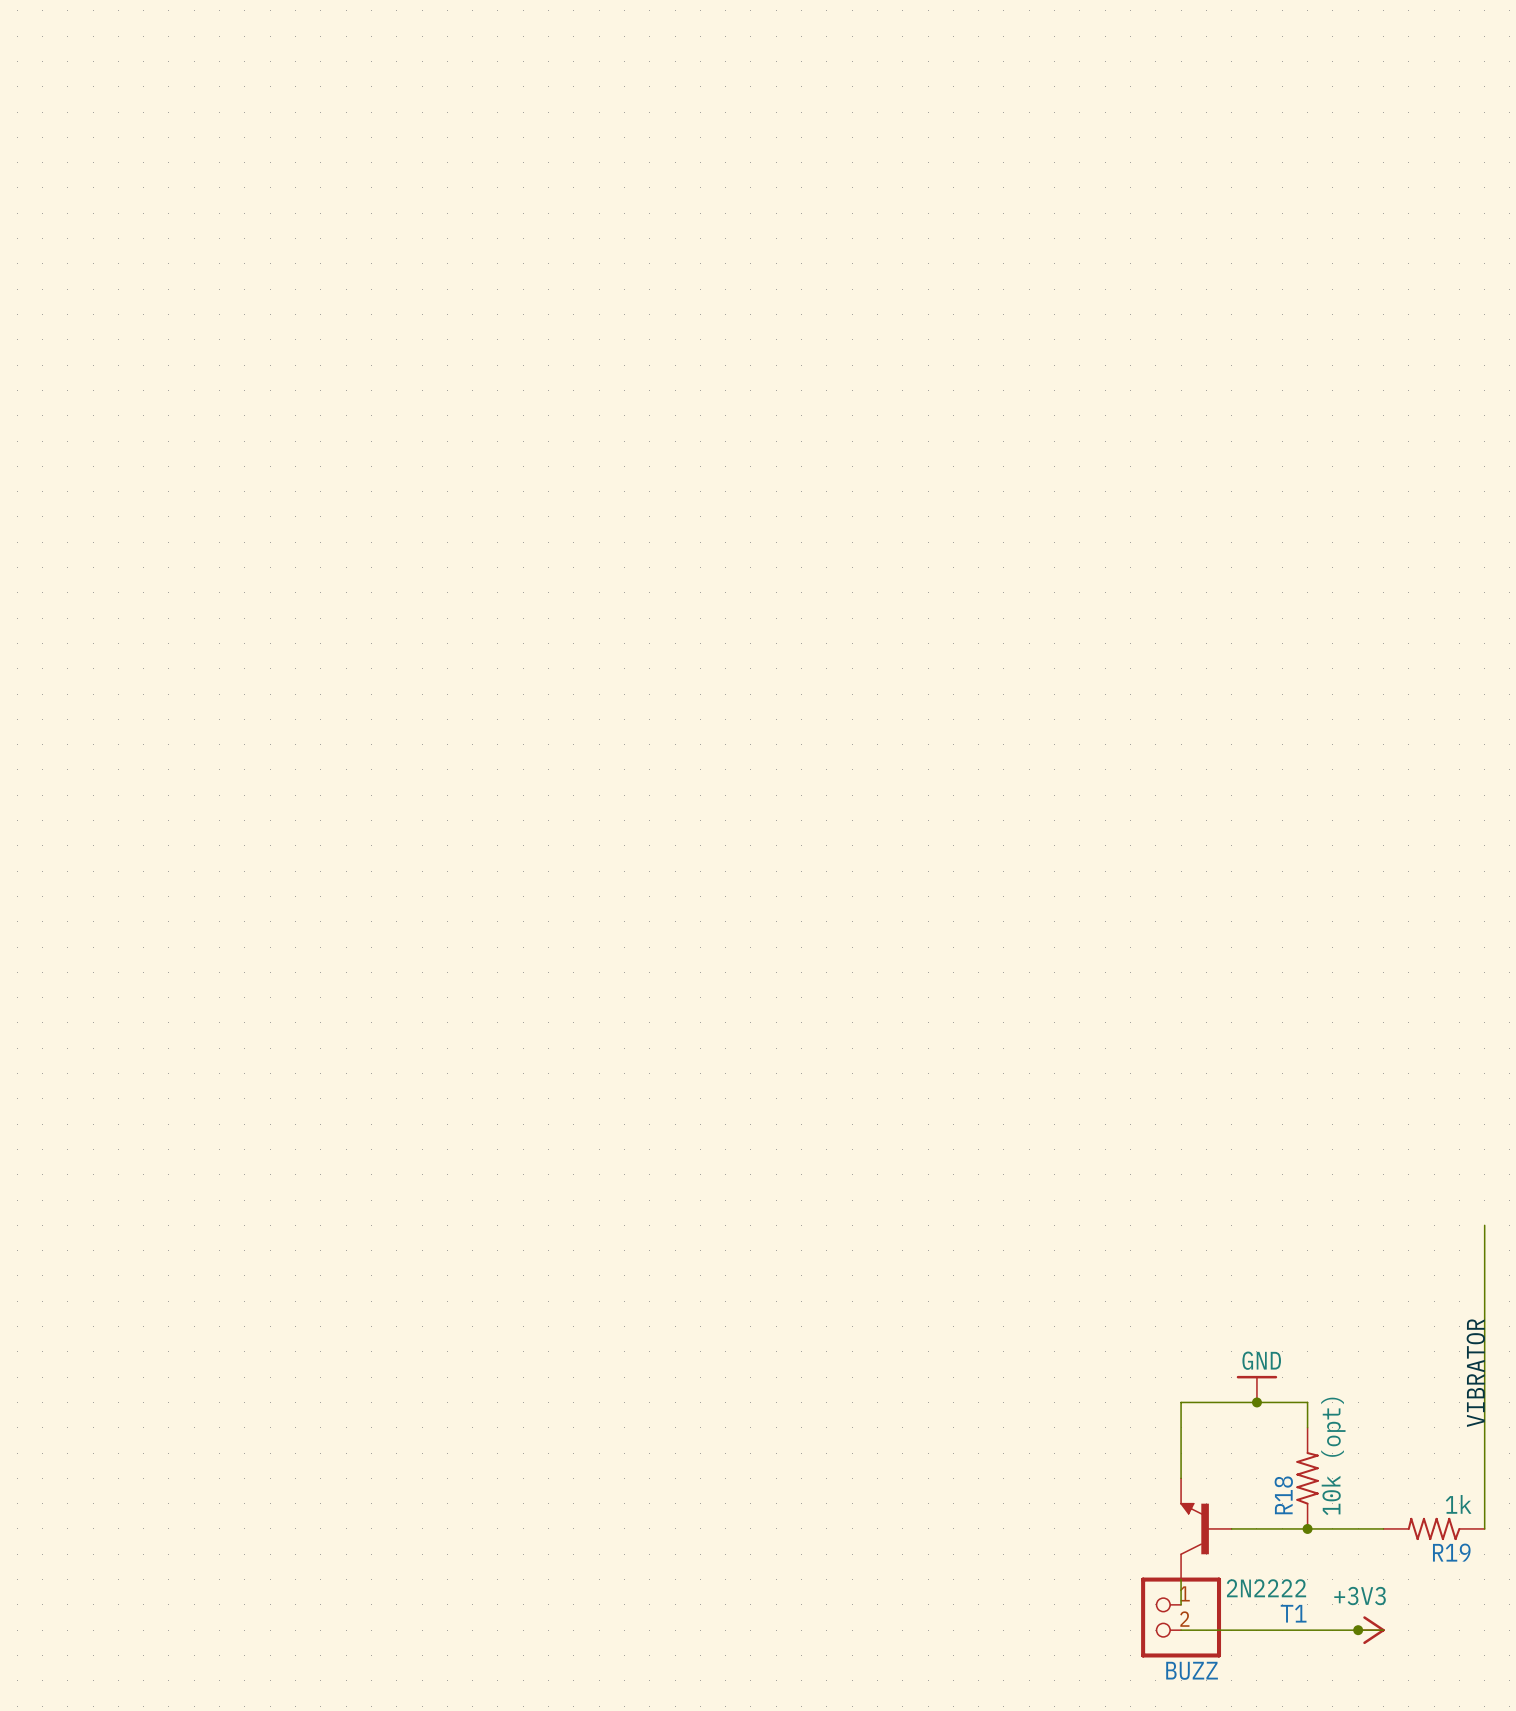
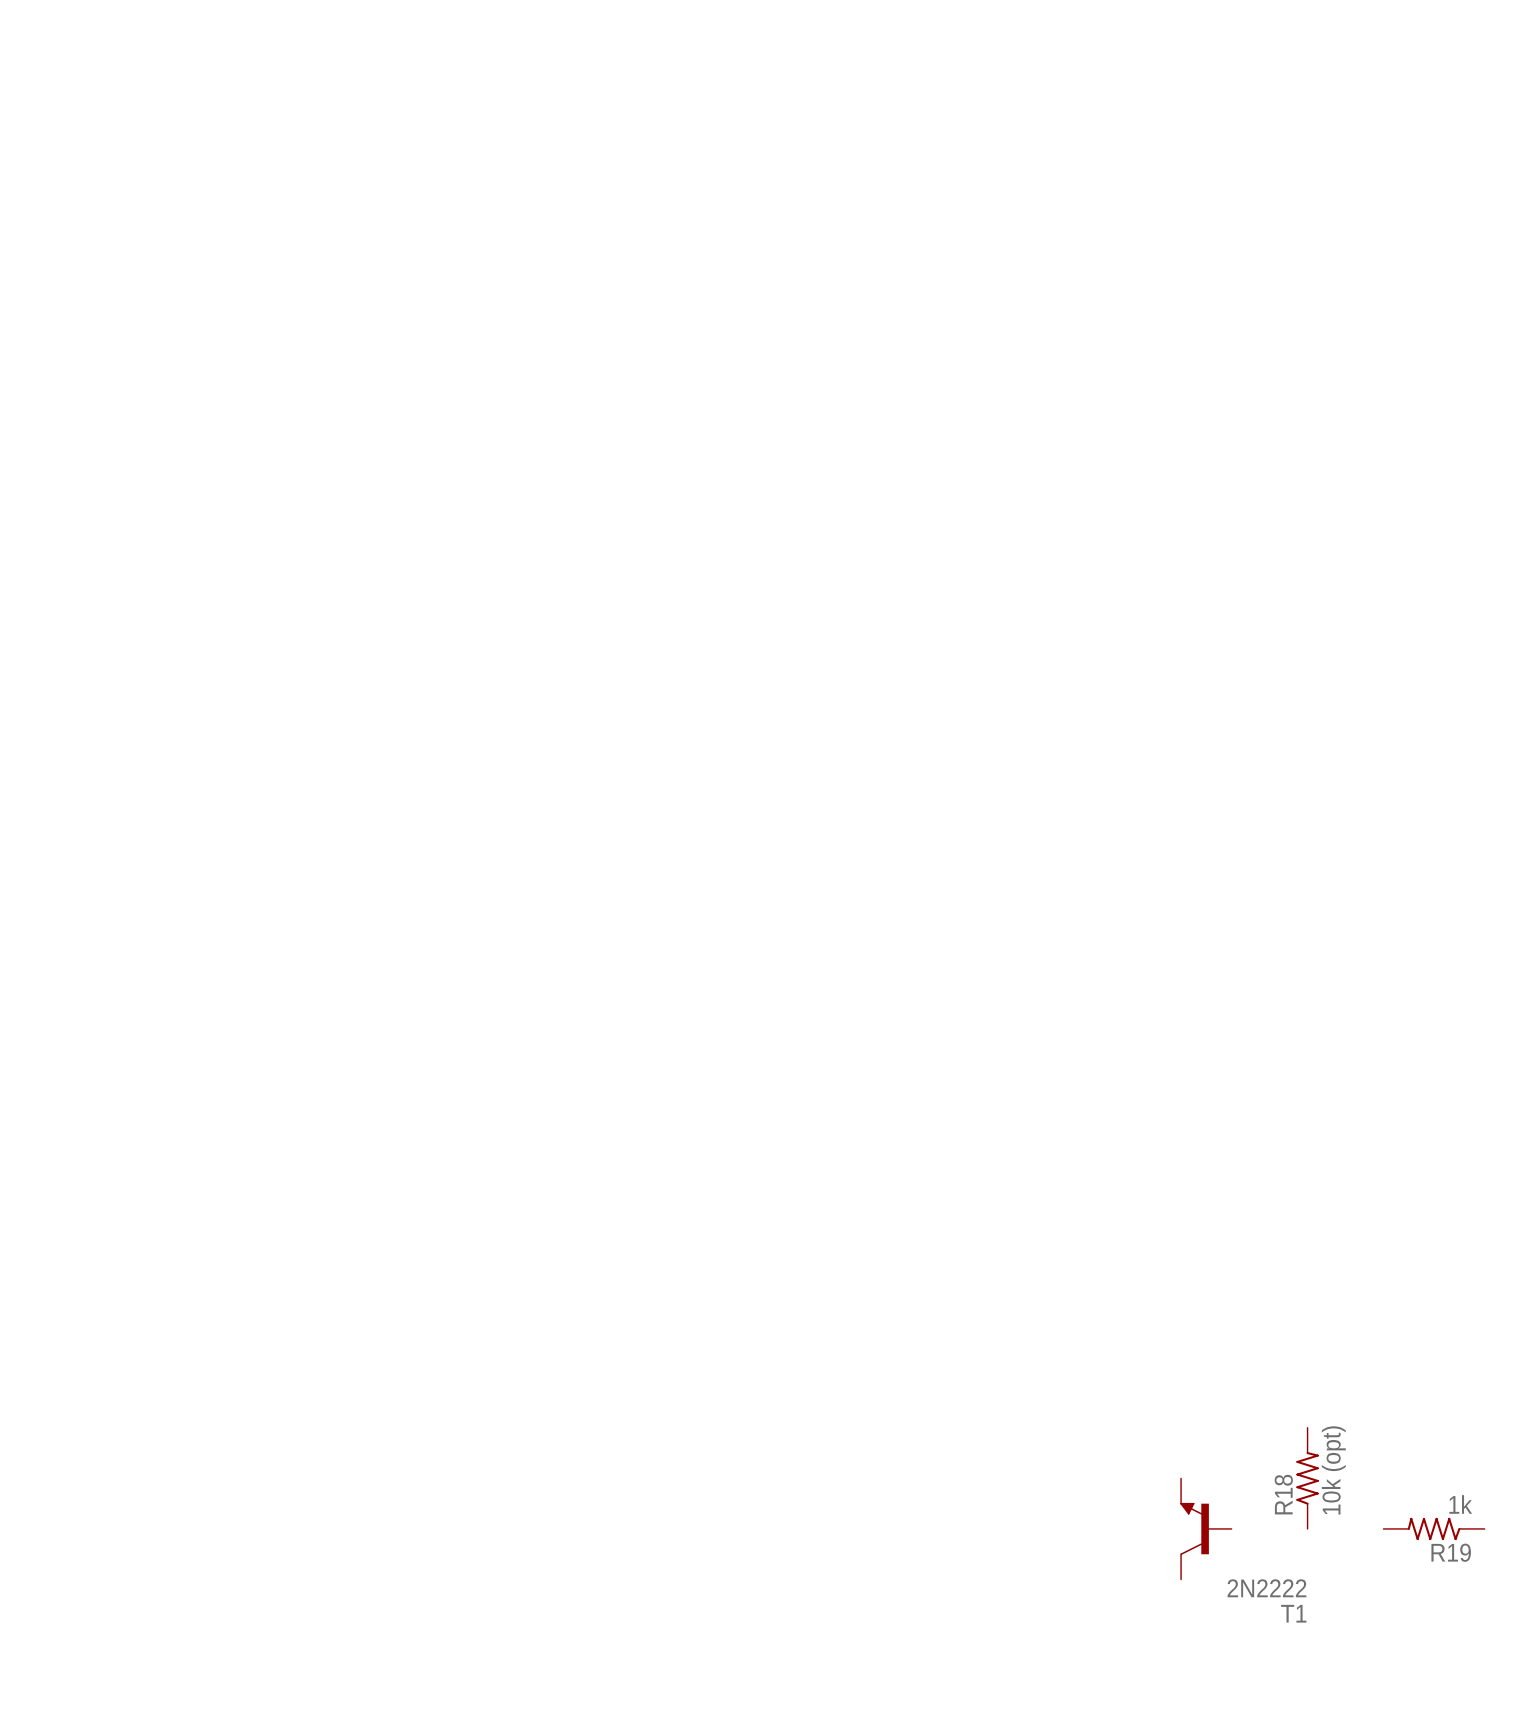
wire: (1484, 1225) (1484, 1528) -> none
label: VIBRATOR (1475, 1373) -> none
power symbol: GND (1256, 1389) -> none
junction: (1256, 1402) -> none
wire: (1307, 1427) (1307, 1402) (1181, 1402) (1181, 1478) -> none
wire: (1231, 1528) (1383, 1528) -> none
junction: (1307, 1528) -> none
wire: (1181, 1579) (1181, 1604) -> none
BUZZ: (1181, 1617) -> none
wire: (1181, 1630) (1383, 1630) -> none
junction: (1358, 1630) -> none
power symbol: +3V3 (1371, 1630) -> none

